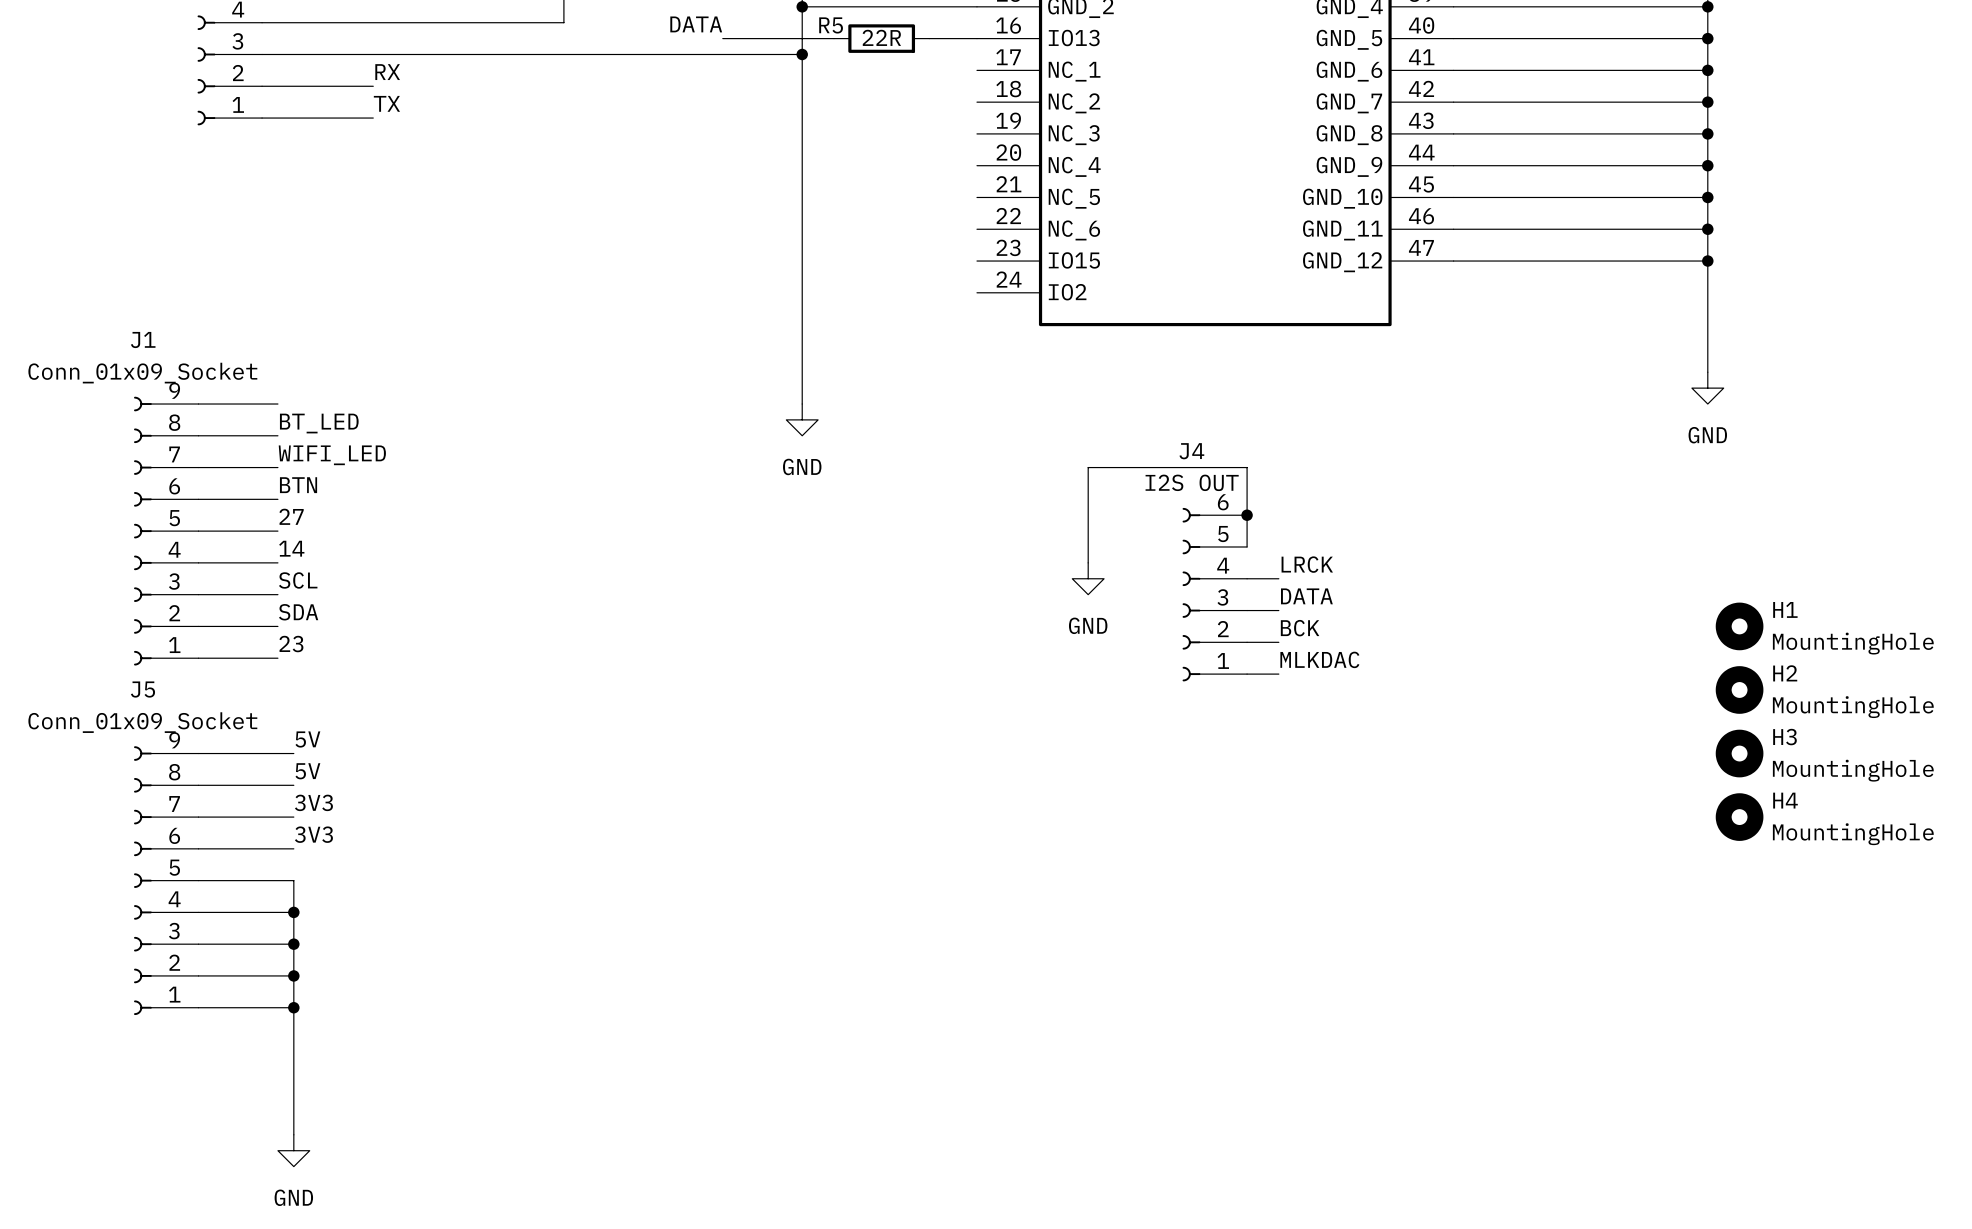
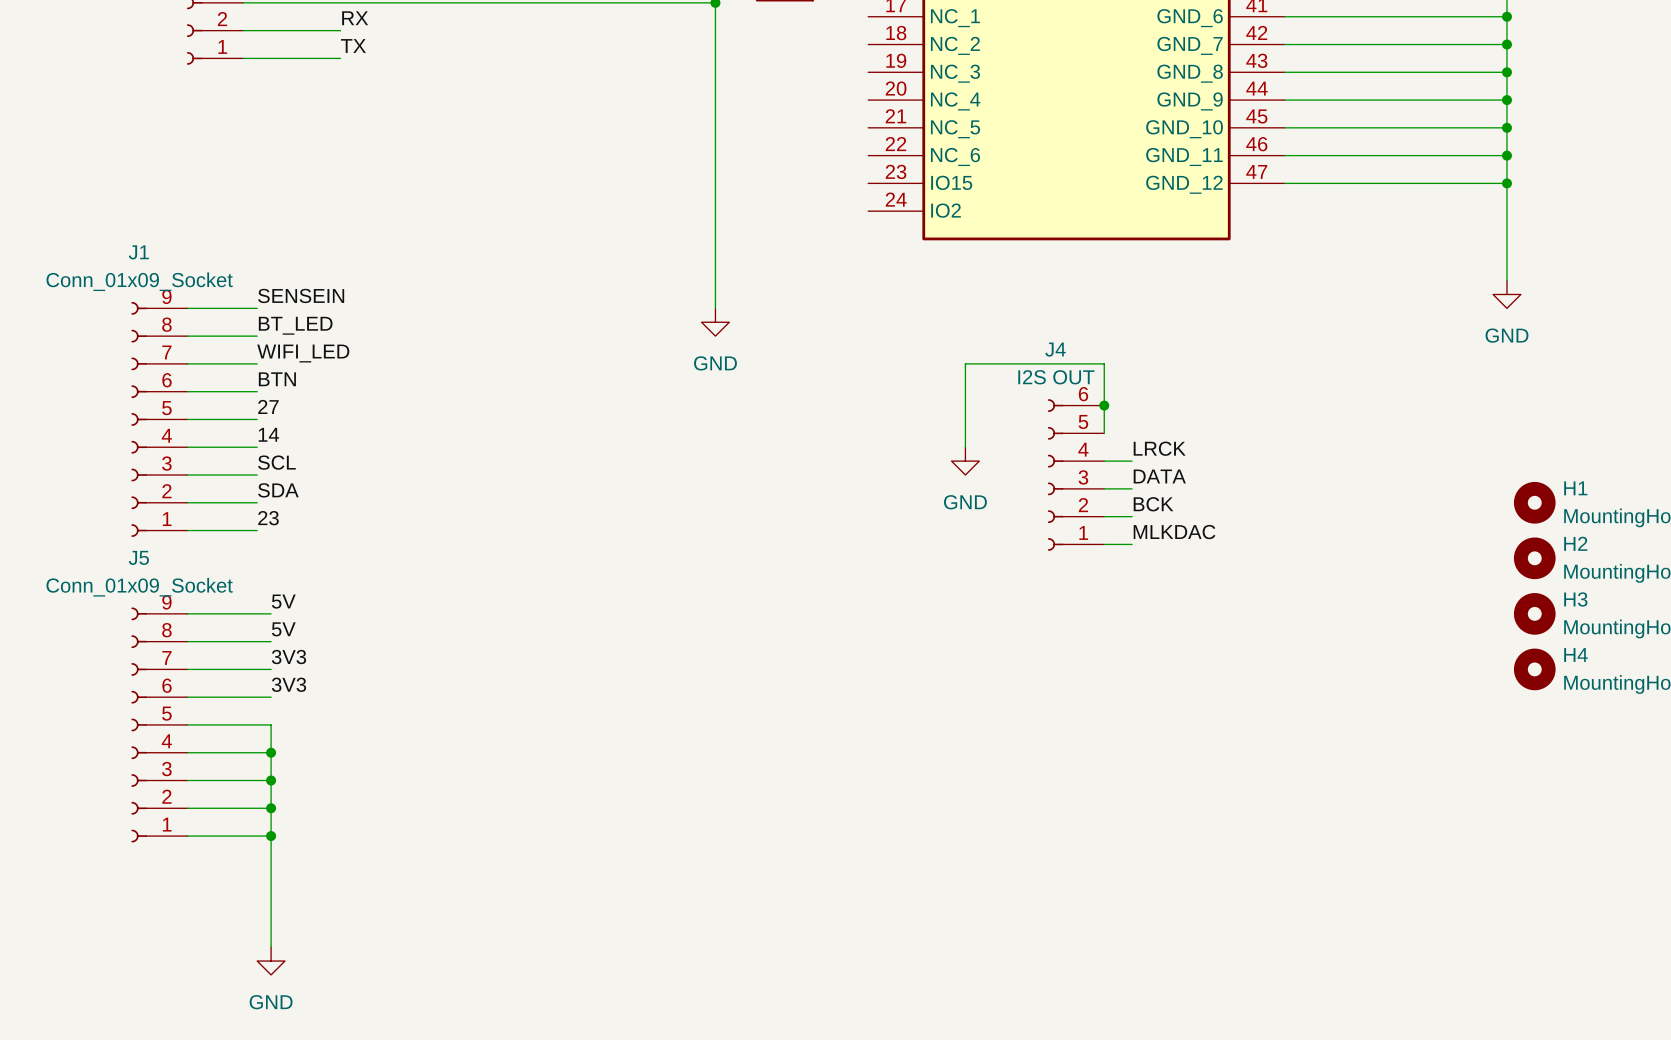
label: none -> SENSEIN (301, 295)

